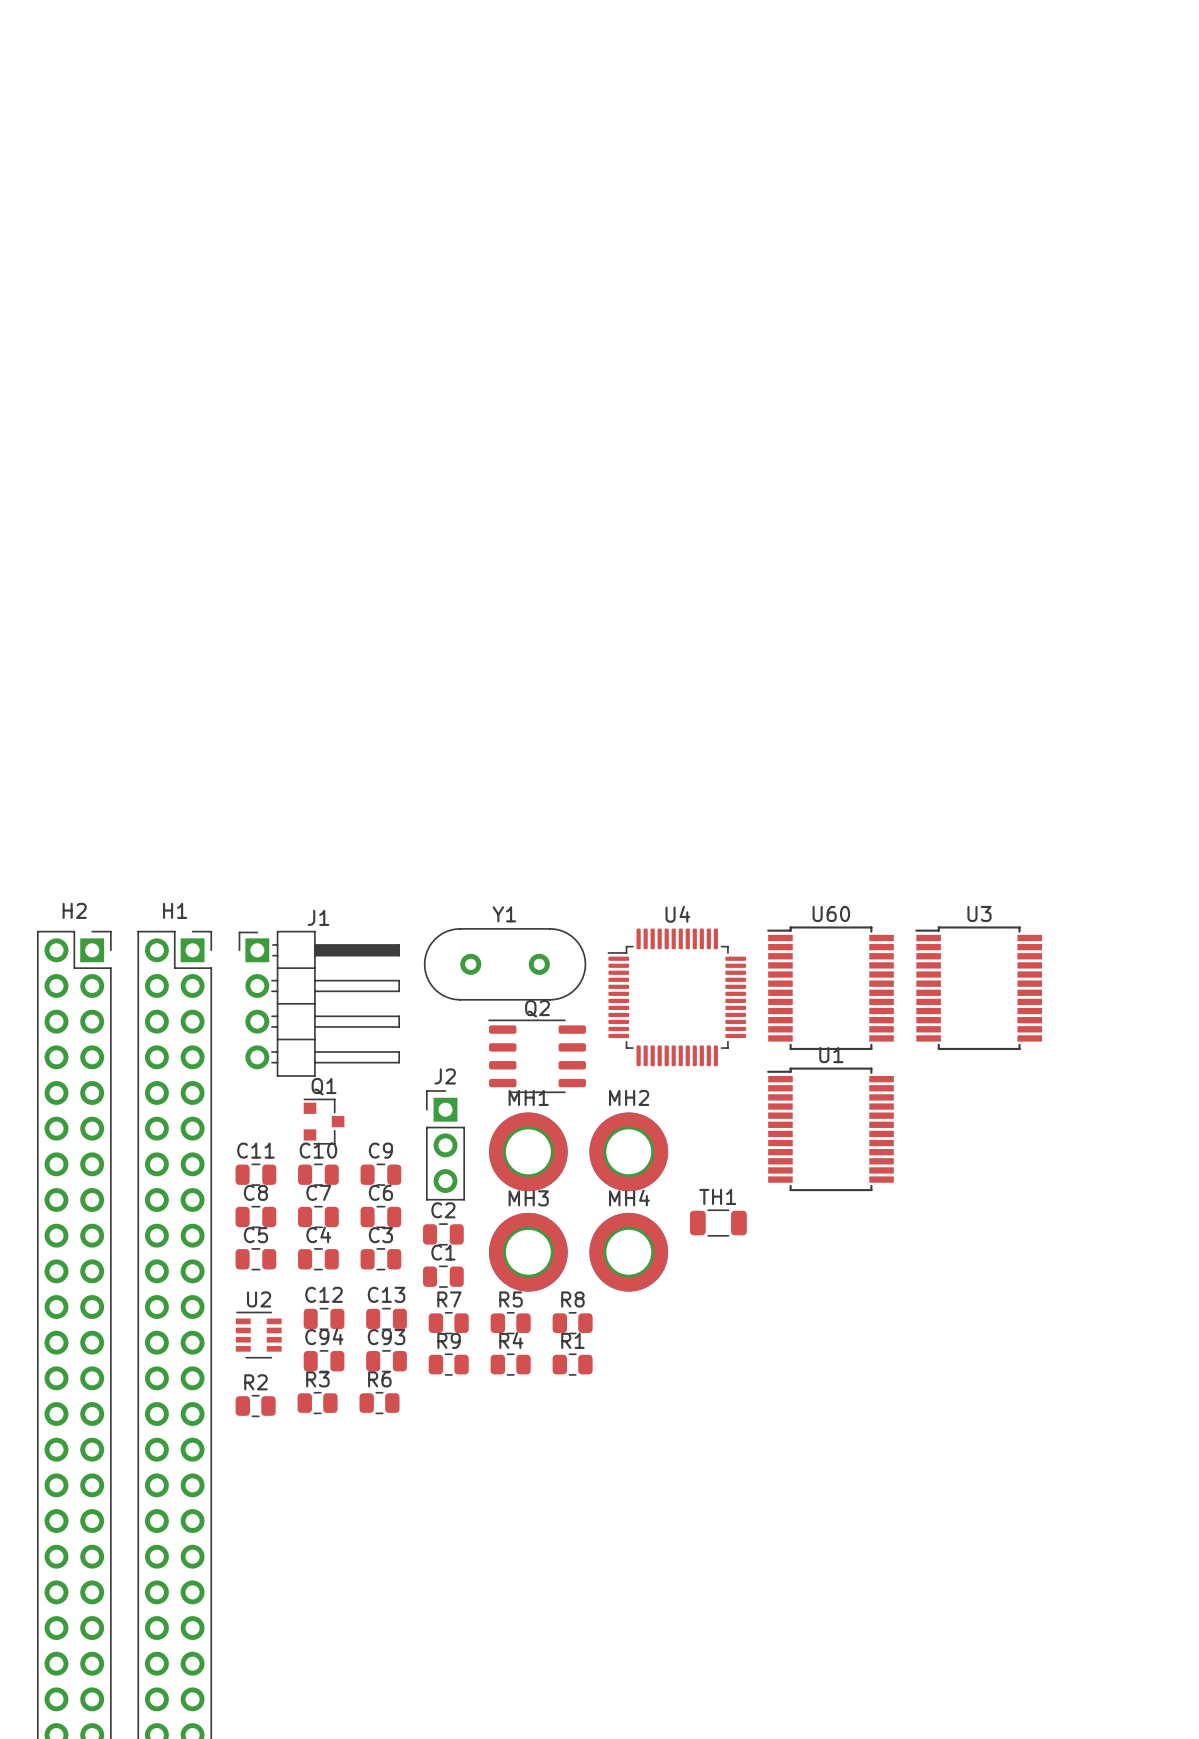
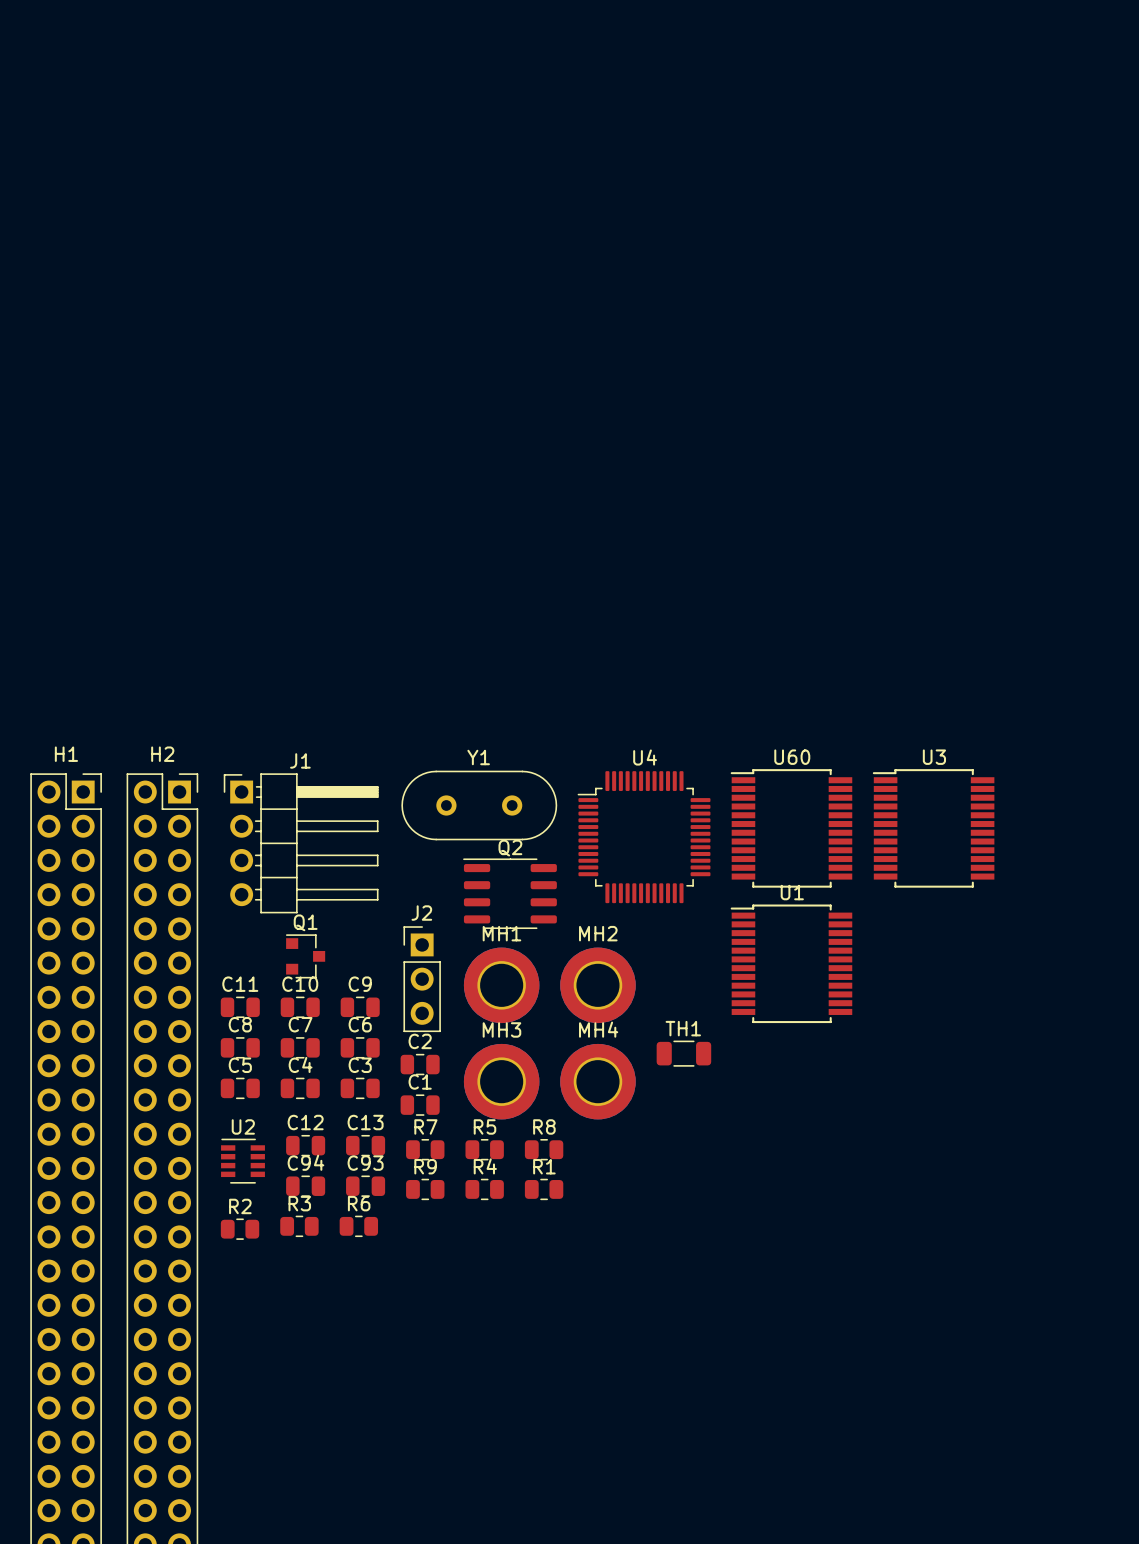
H2 name: H2 (74, 910) -> H1 (66, 754)
H1 name: H1 (175, 910) -> H2 (162, 754)

